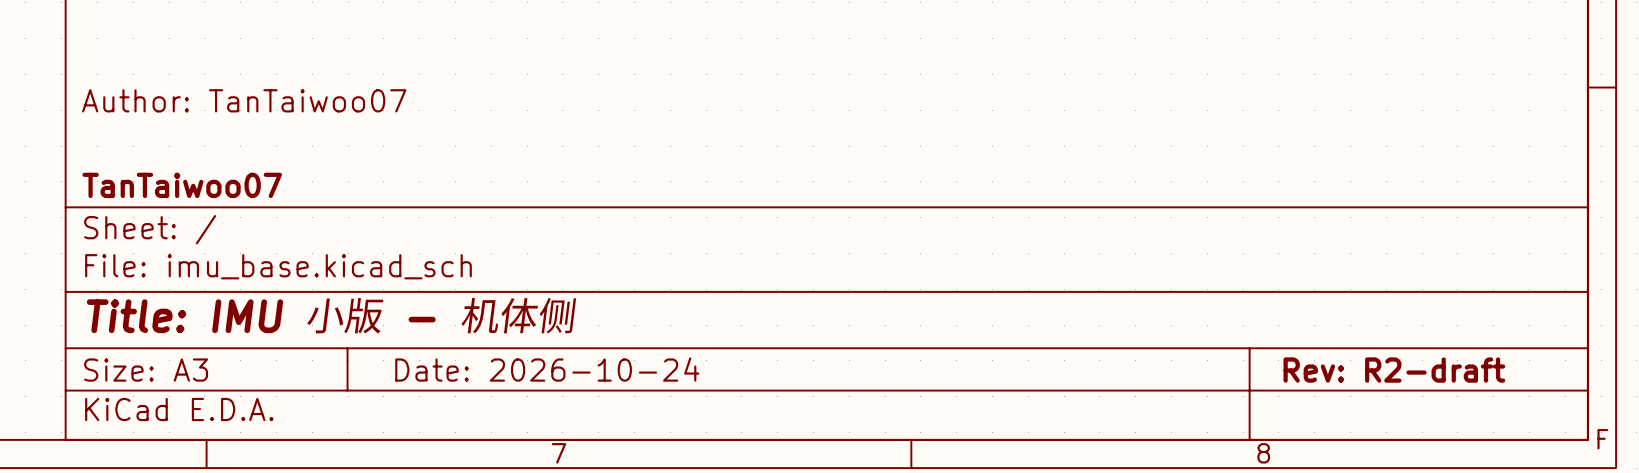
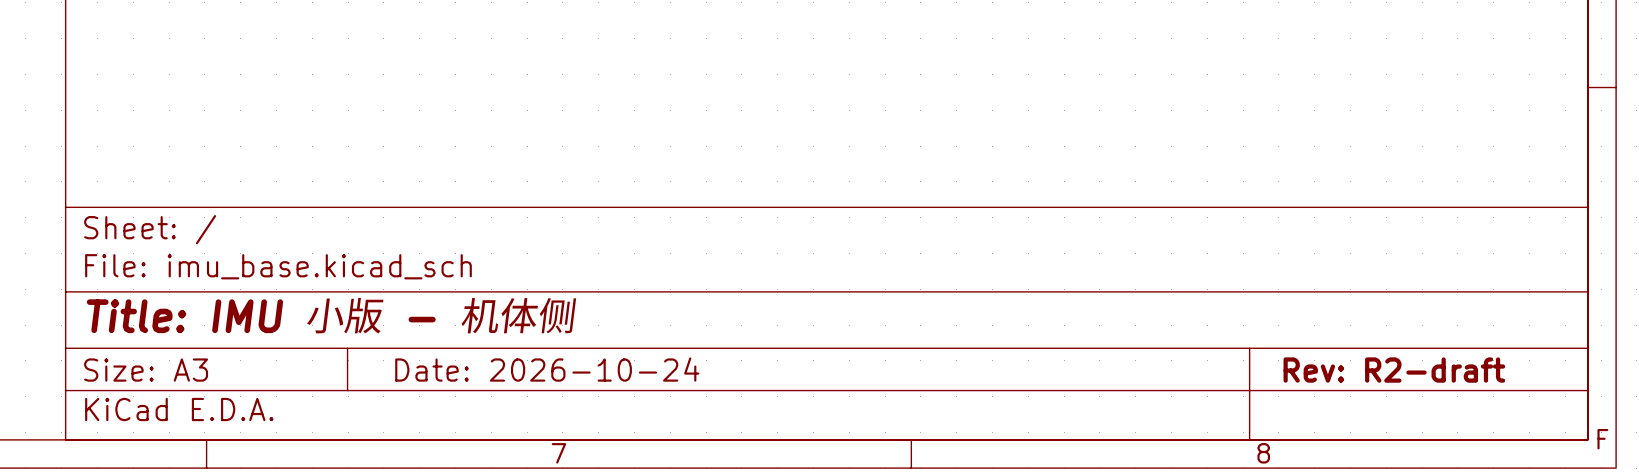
title block: Author: TanTaiwoo07 (244, 100) -> none
title block: TanTaiwoo07 (182, 185) -> none

